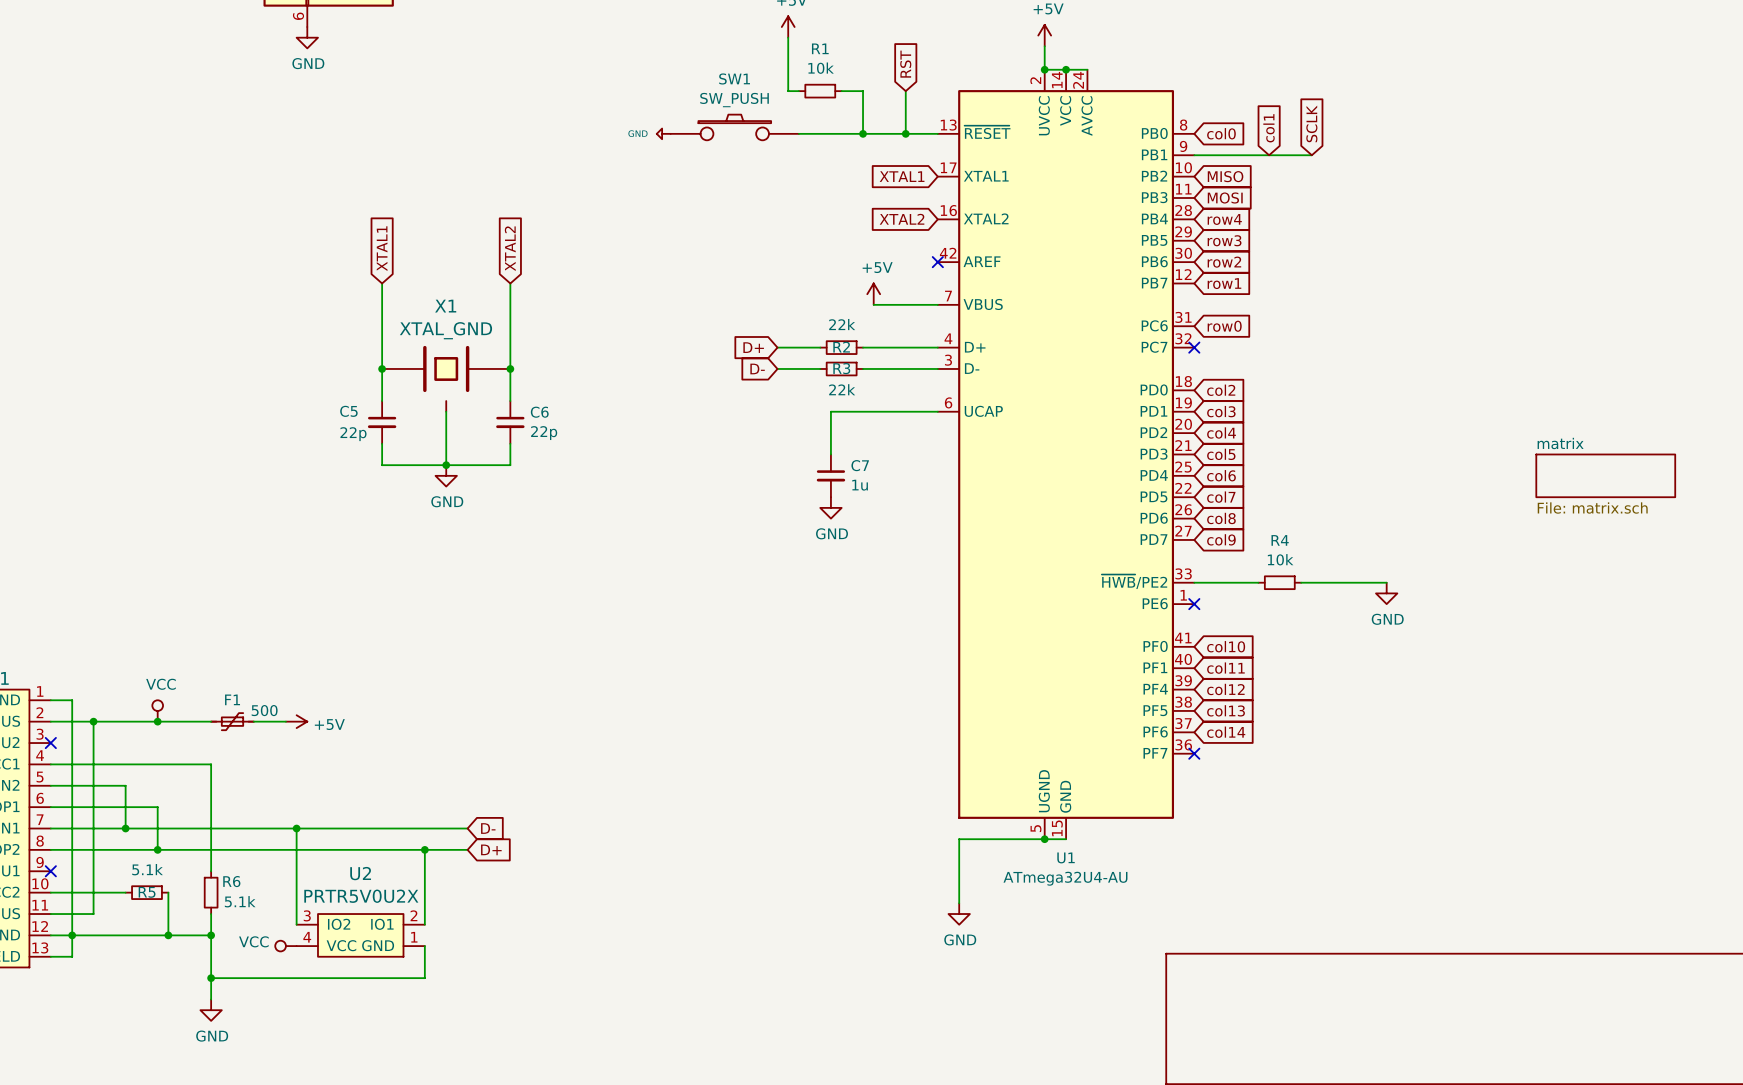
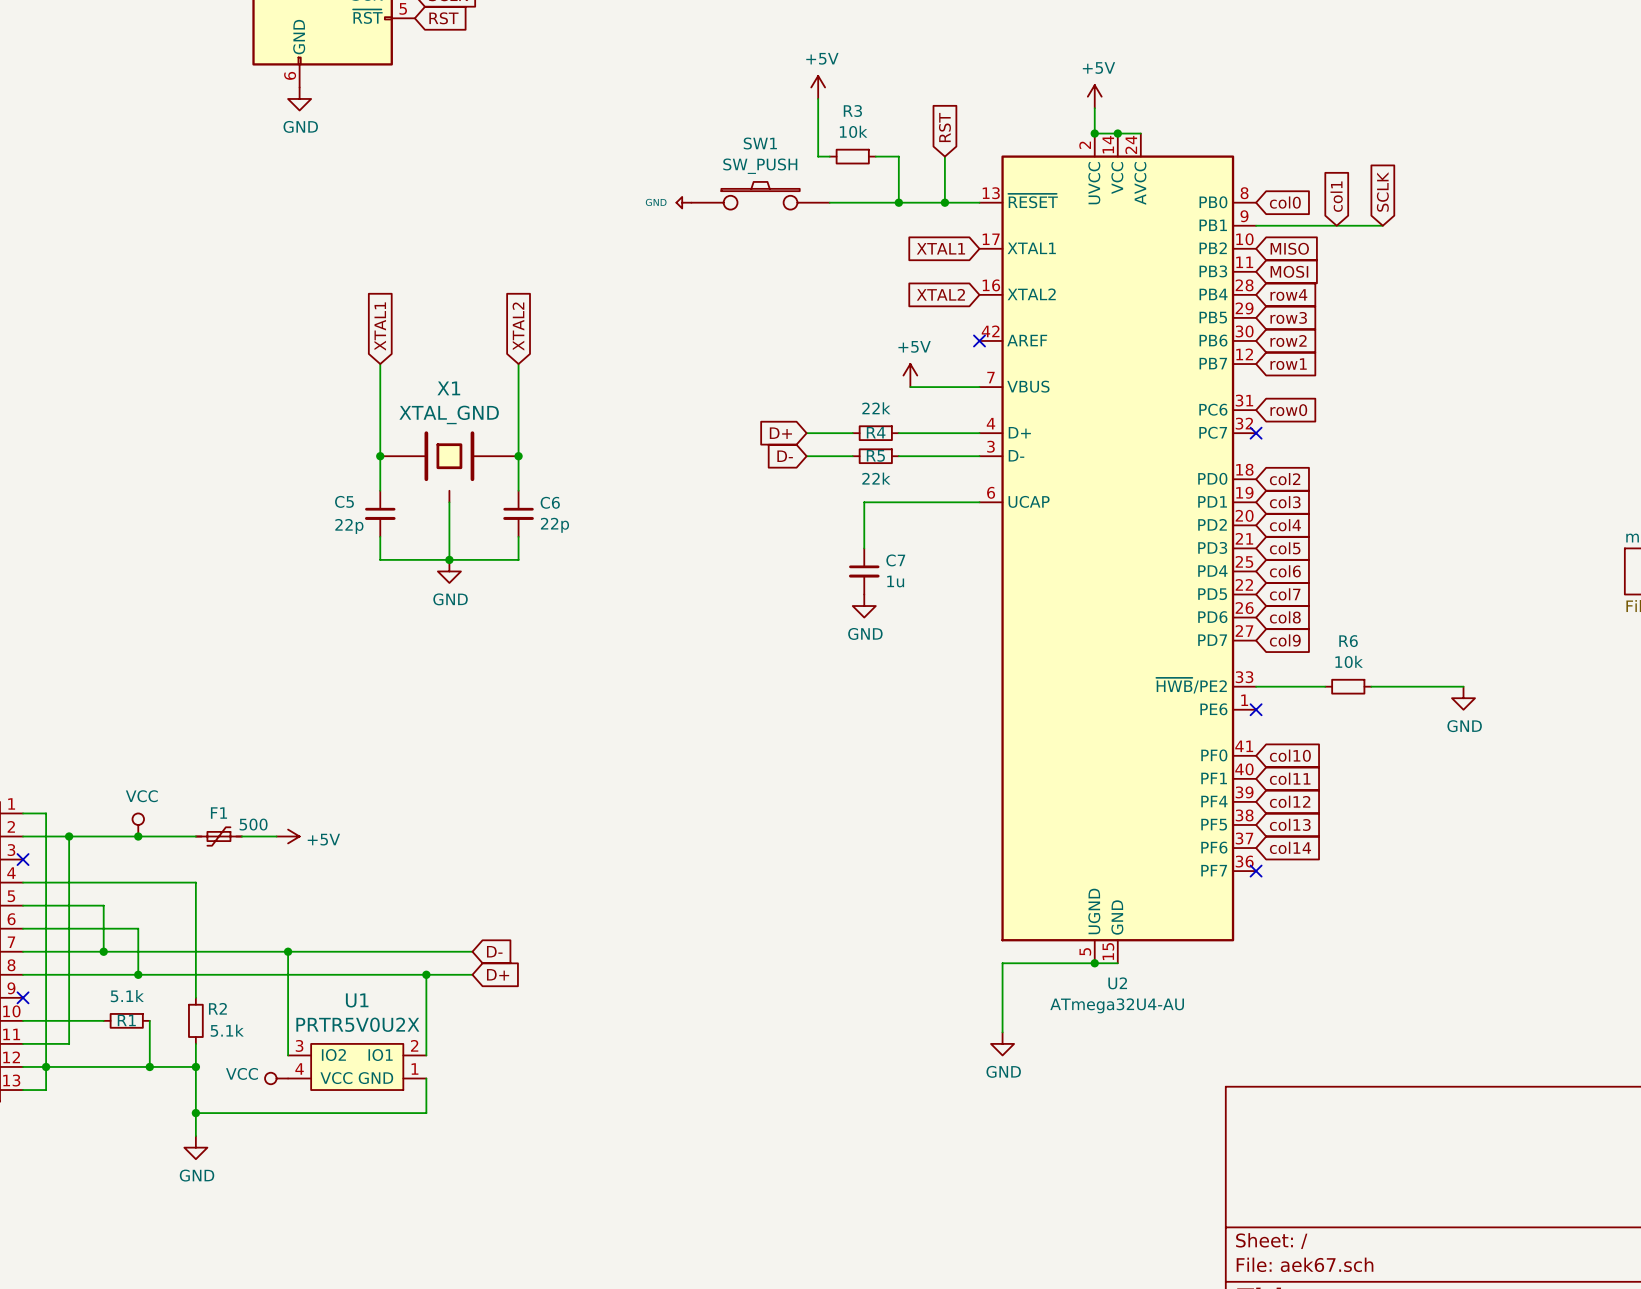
R1 name: R1 (820, 48) -> R3 (852, 111)
R2 name: R2 (841, 347) -> R4 (876, 432)
R3 name: R3 (841, 368) -> R5 (875, 455)
R4 name: R4 (1280, 540) -> R6 (1348, 641)
U1 name: U1 (1066, 857) -> U2 (1117, 983)
U2 name: U2 (360, 873) -> U1 (357, 1000)
R6 name: R6 (231, 881) -> R2 (217, 1008)
R5 name: R5 (147, 892) -> R1 (126, 1020)

